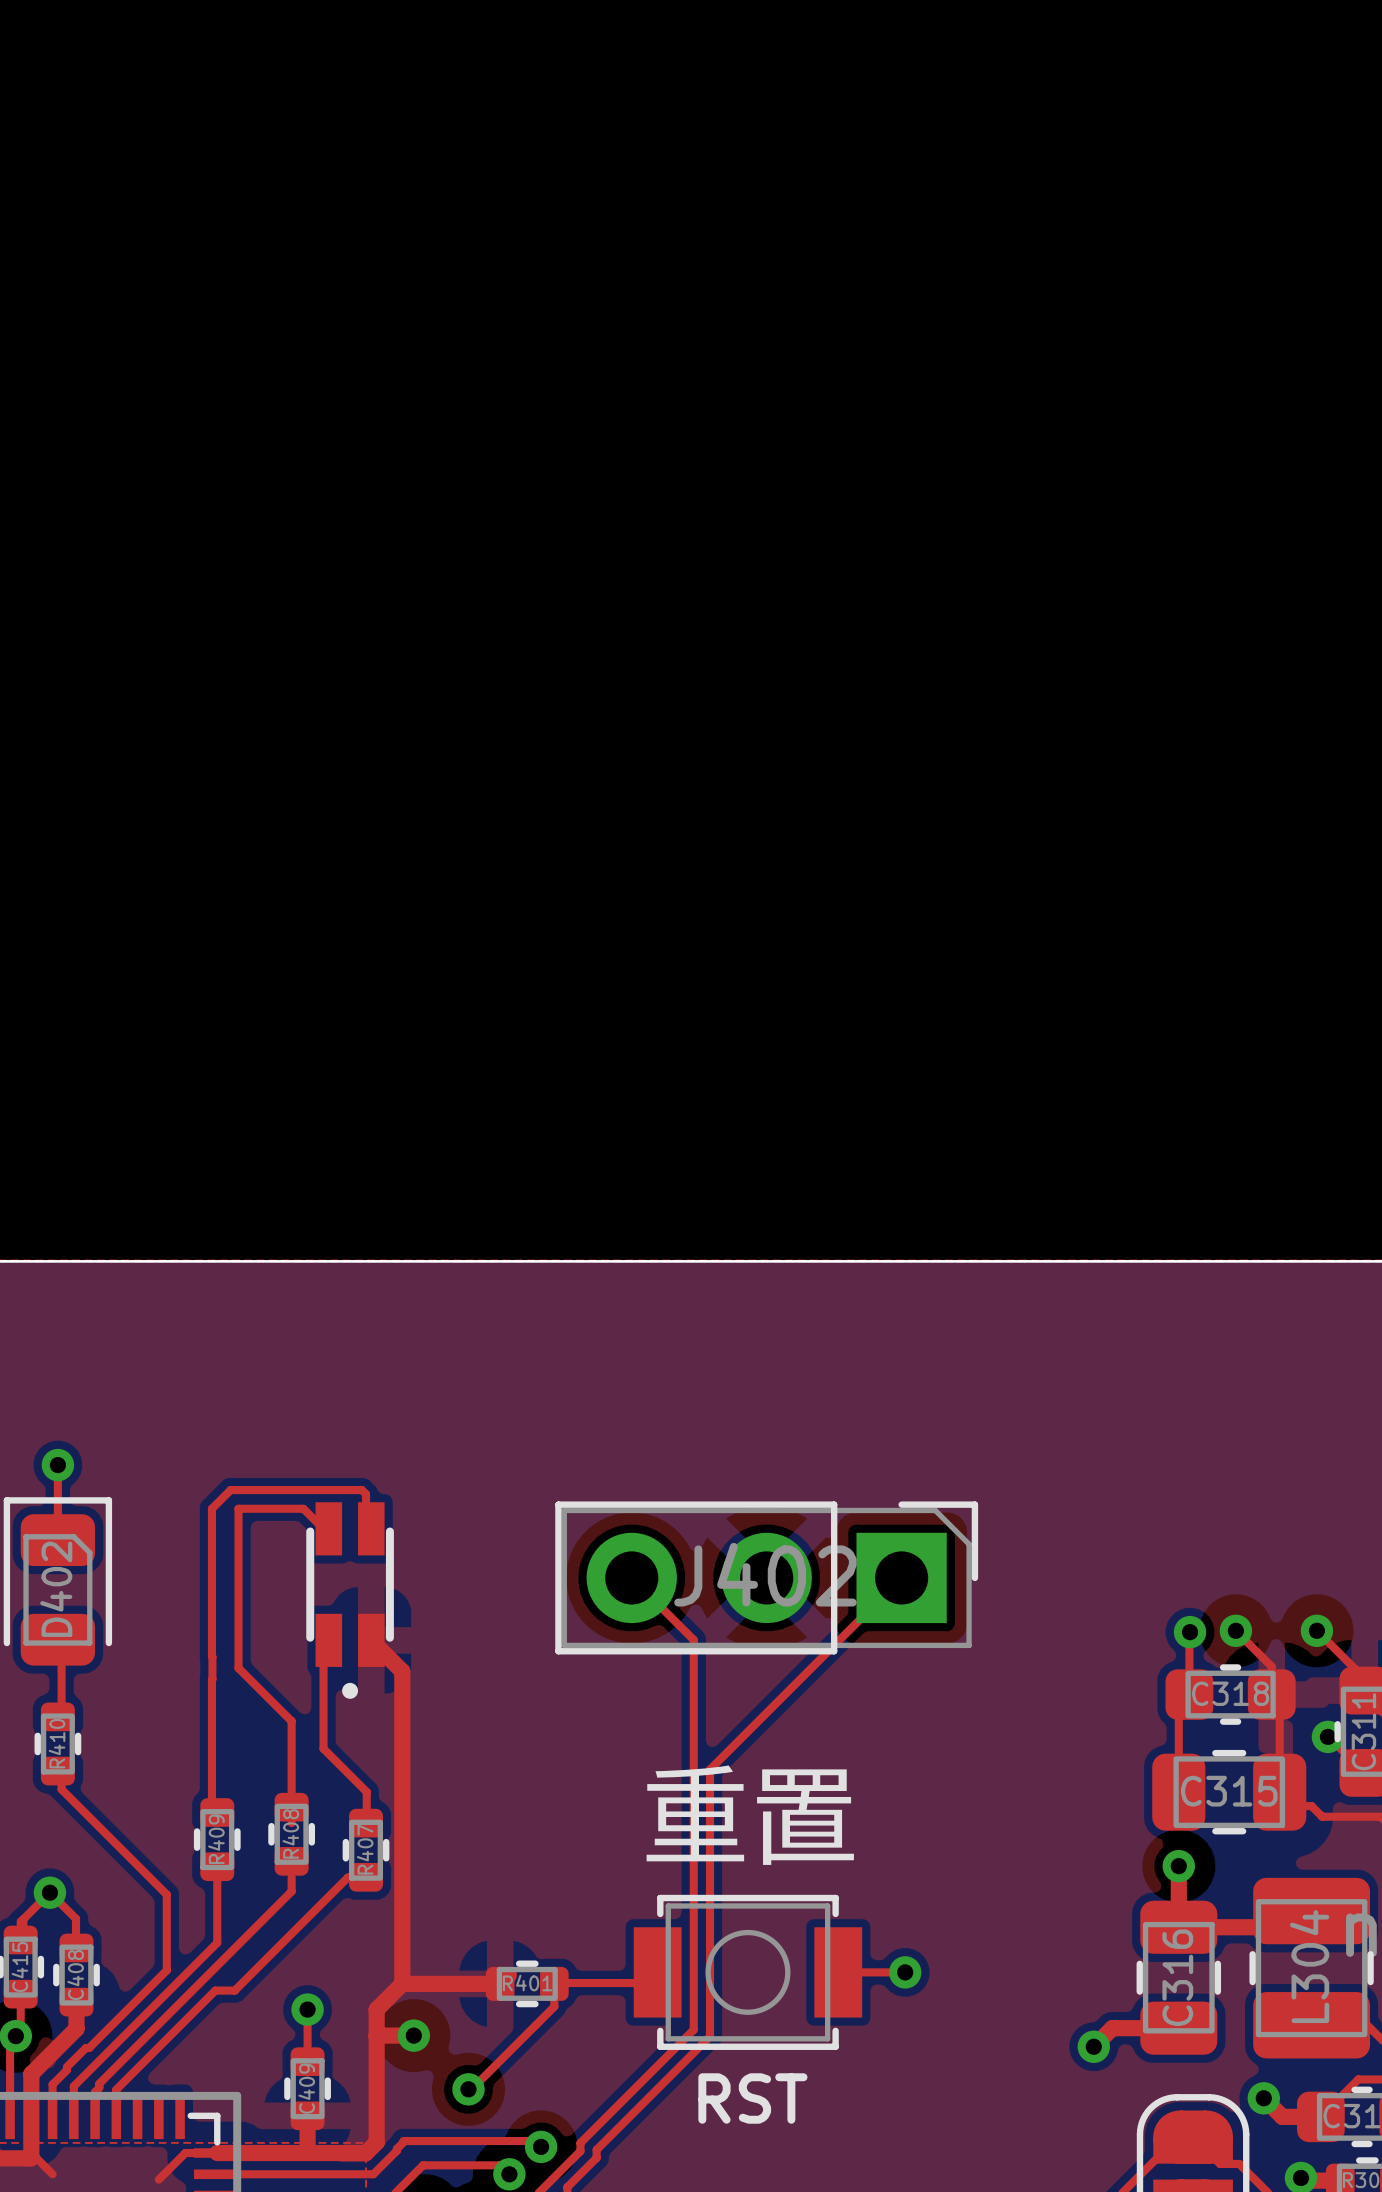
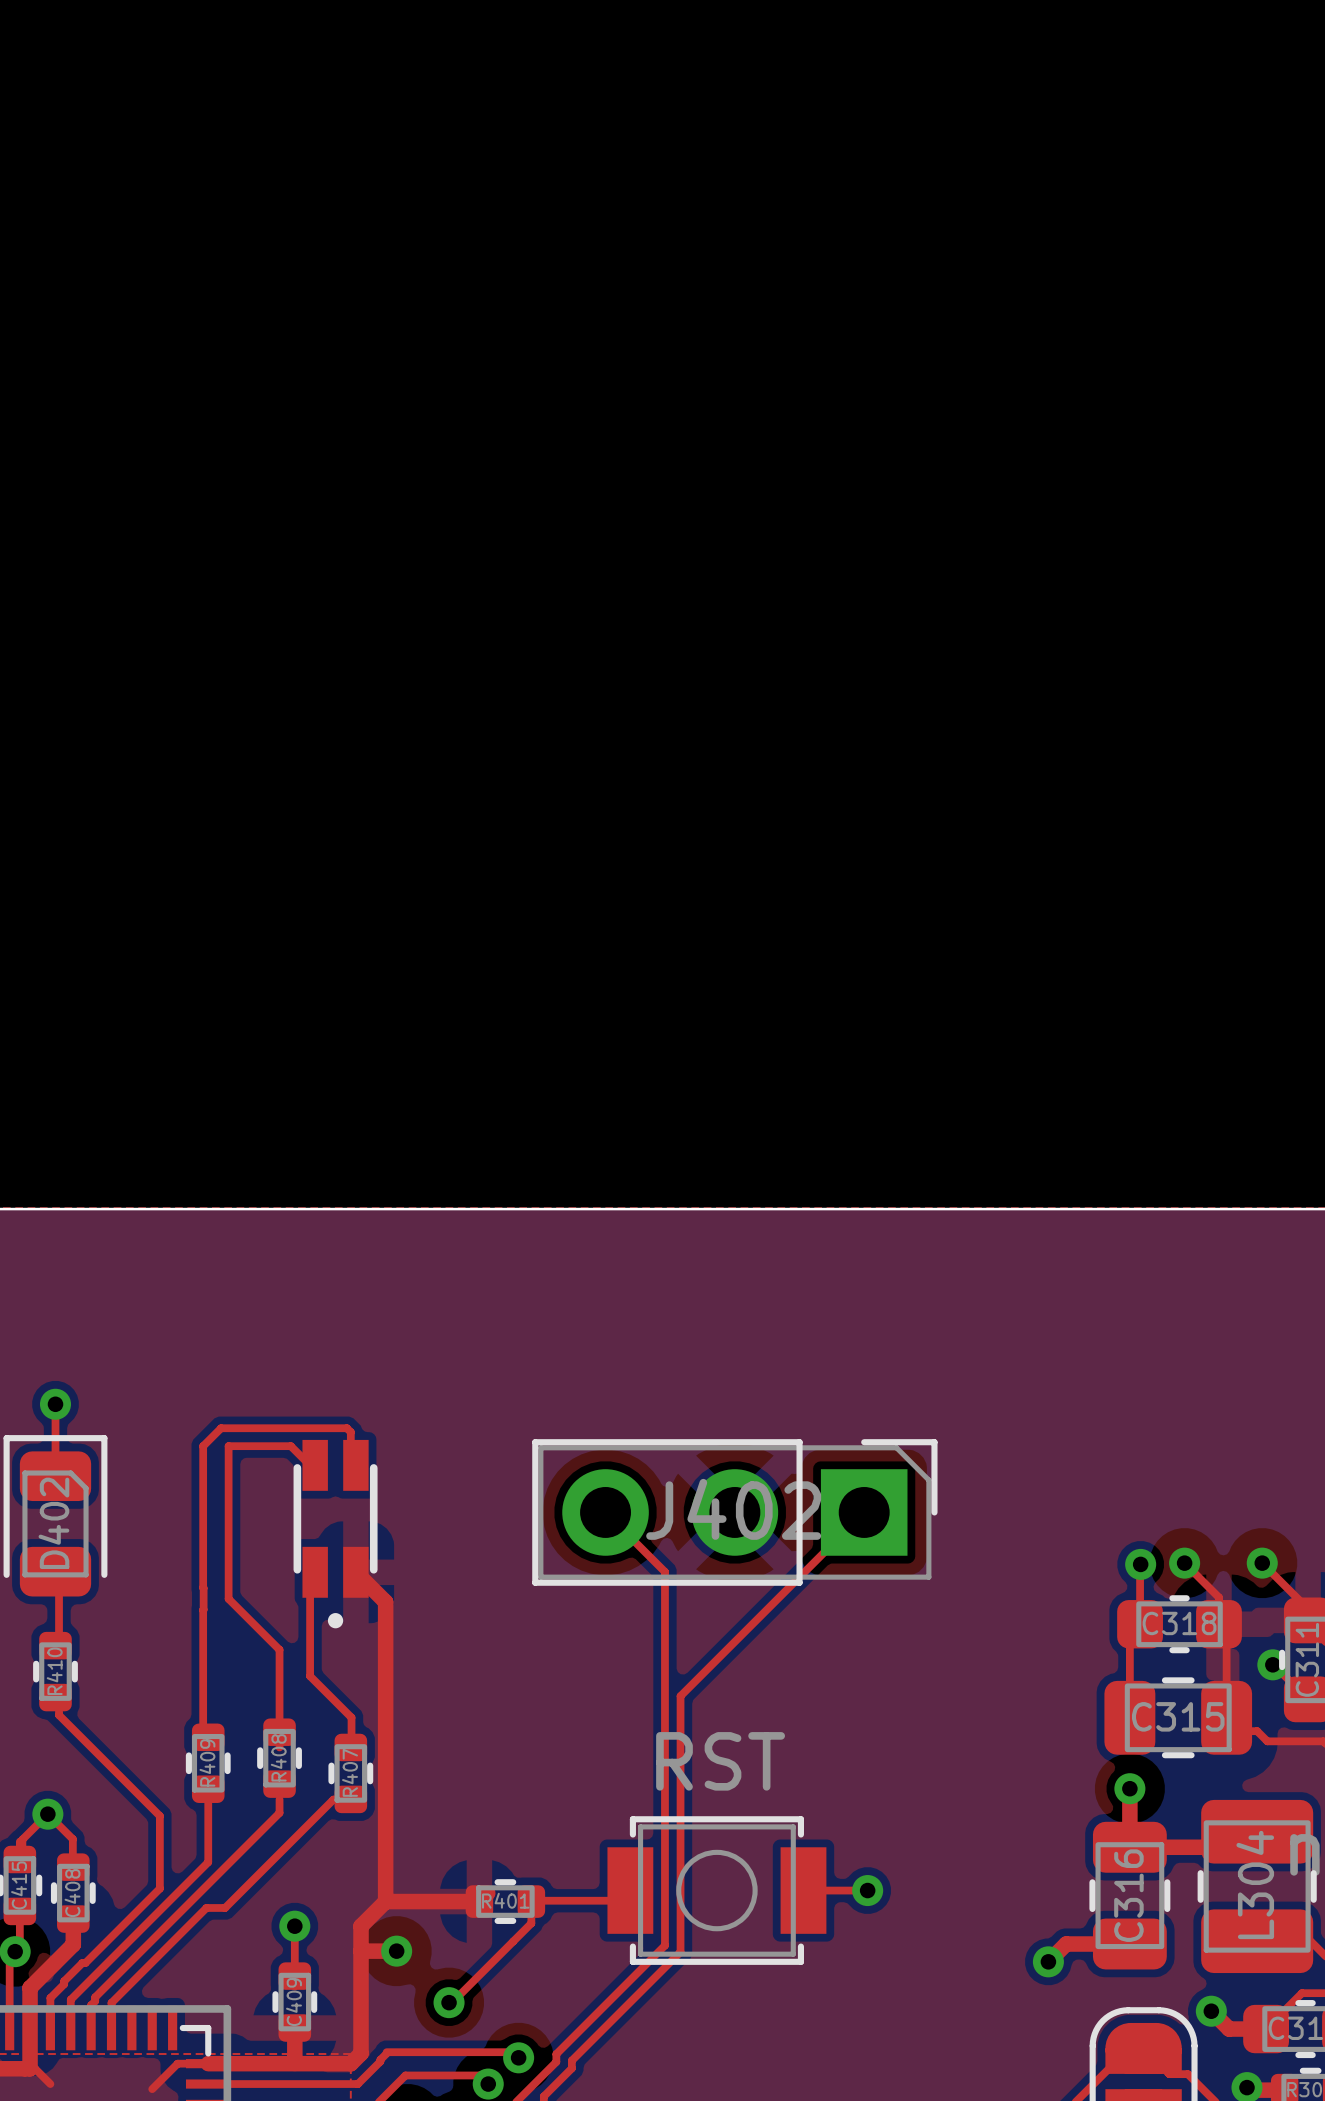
text: 重置 (750, 1815) -> none
part value: none -> RST (720, 1761)
text: RST (752, 2098) -> none

